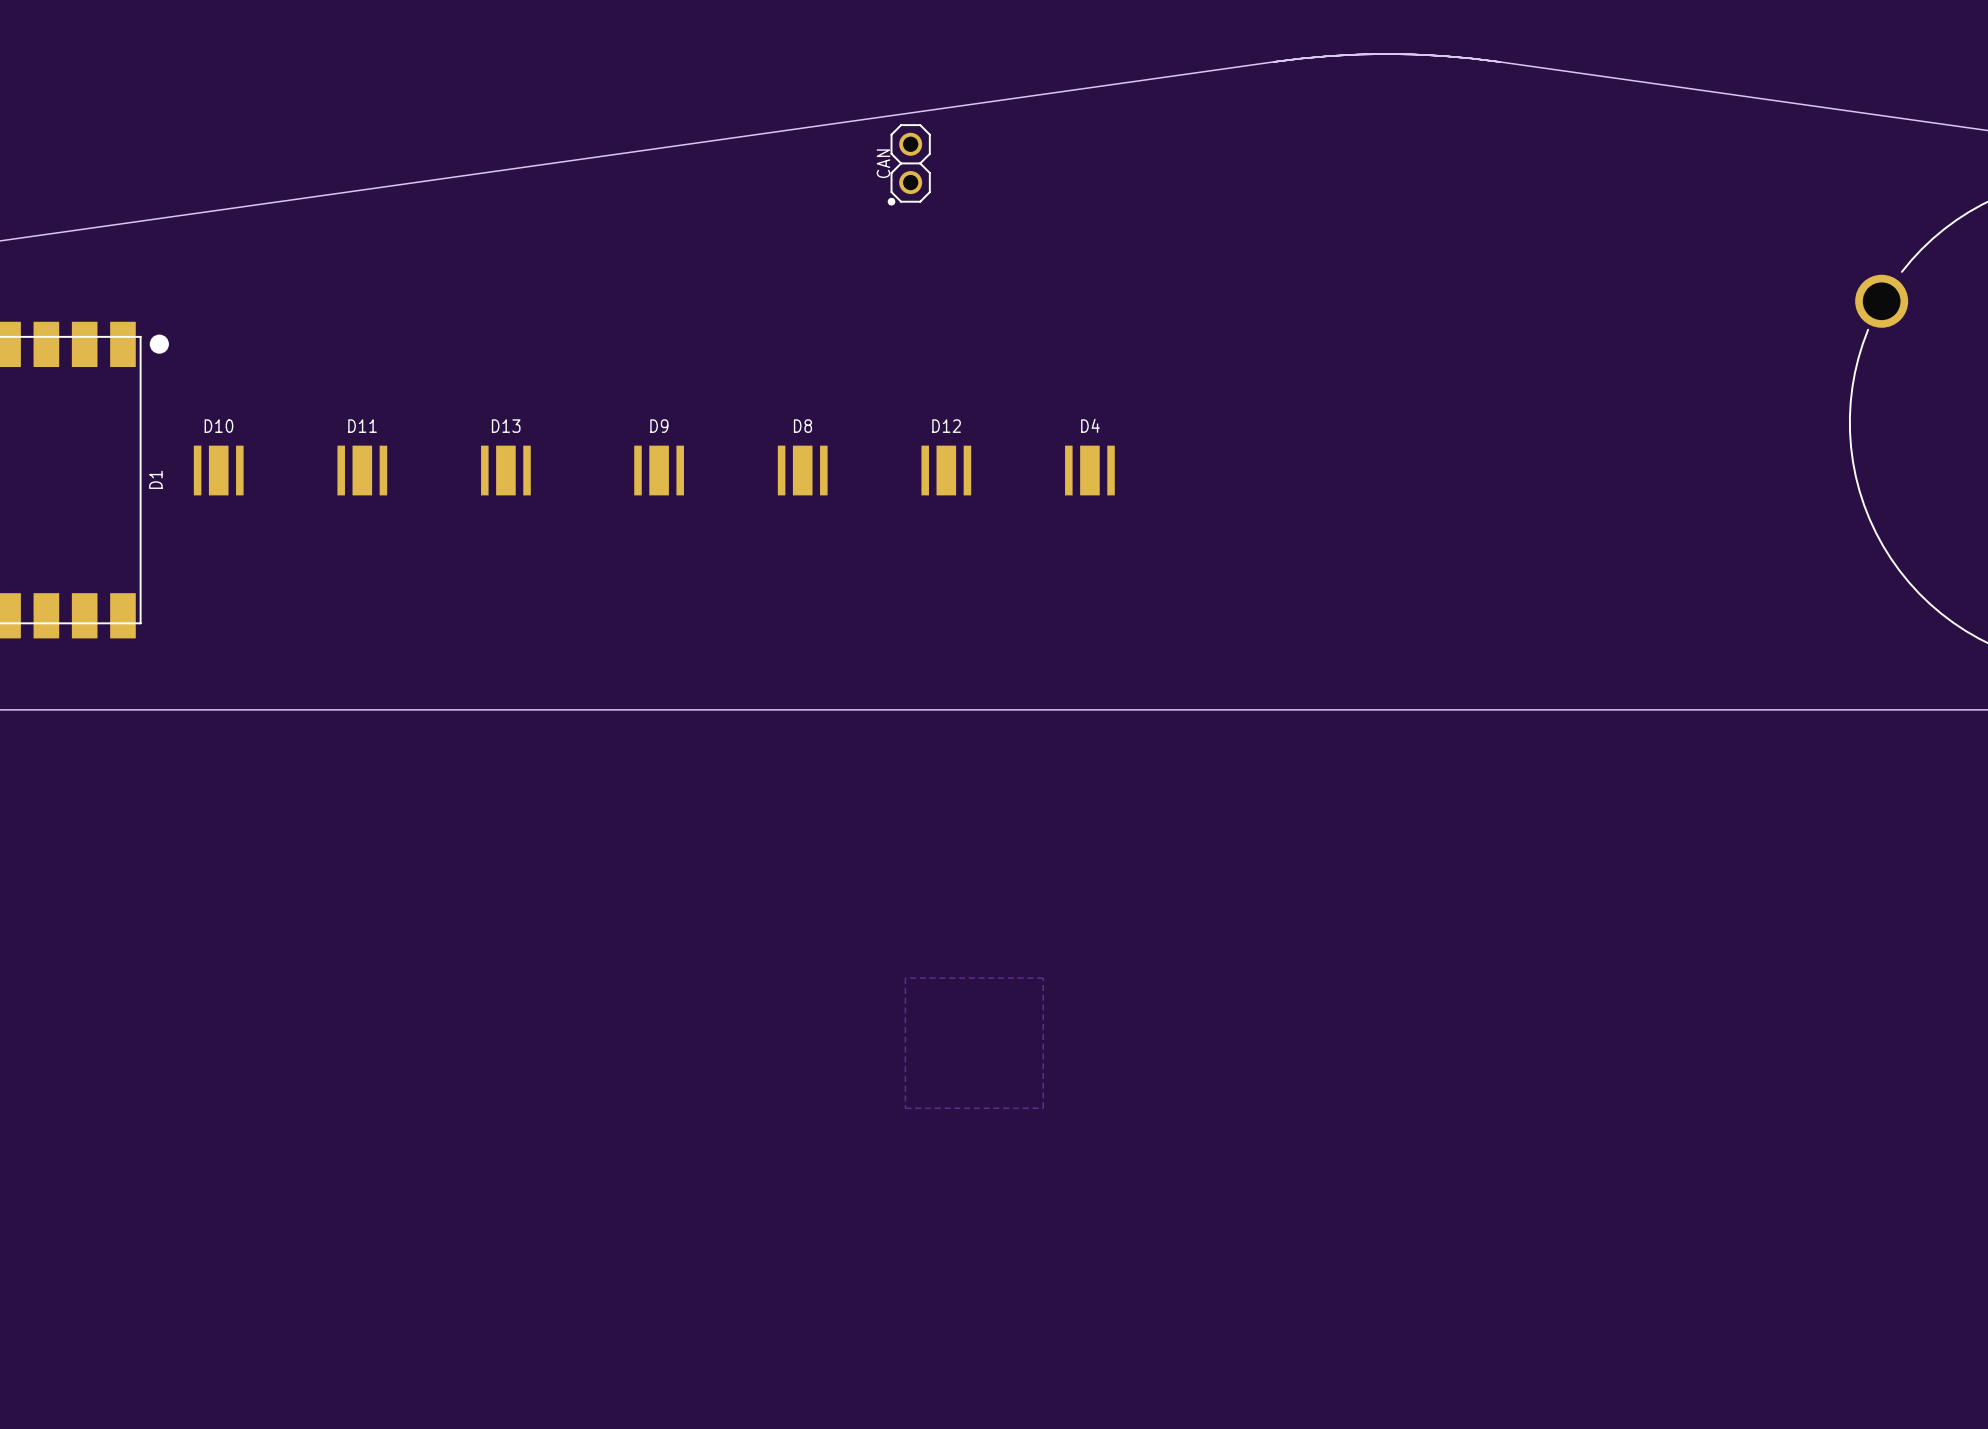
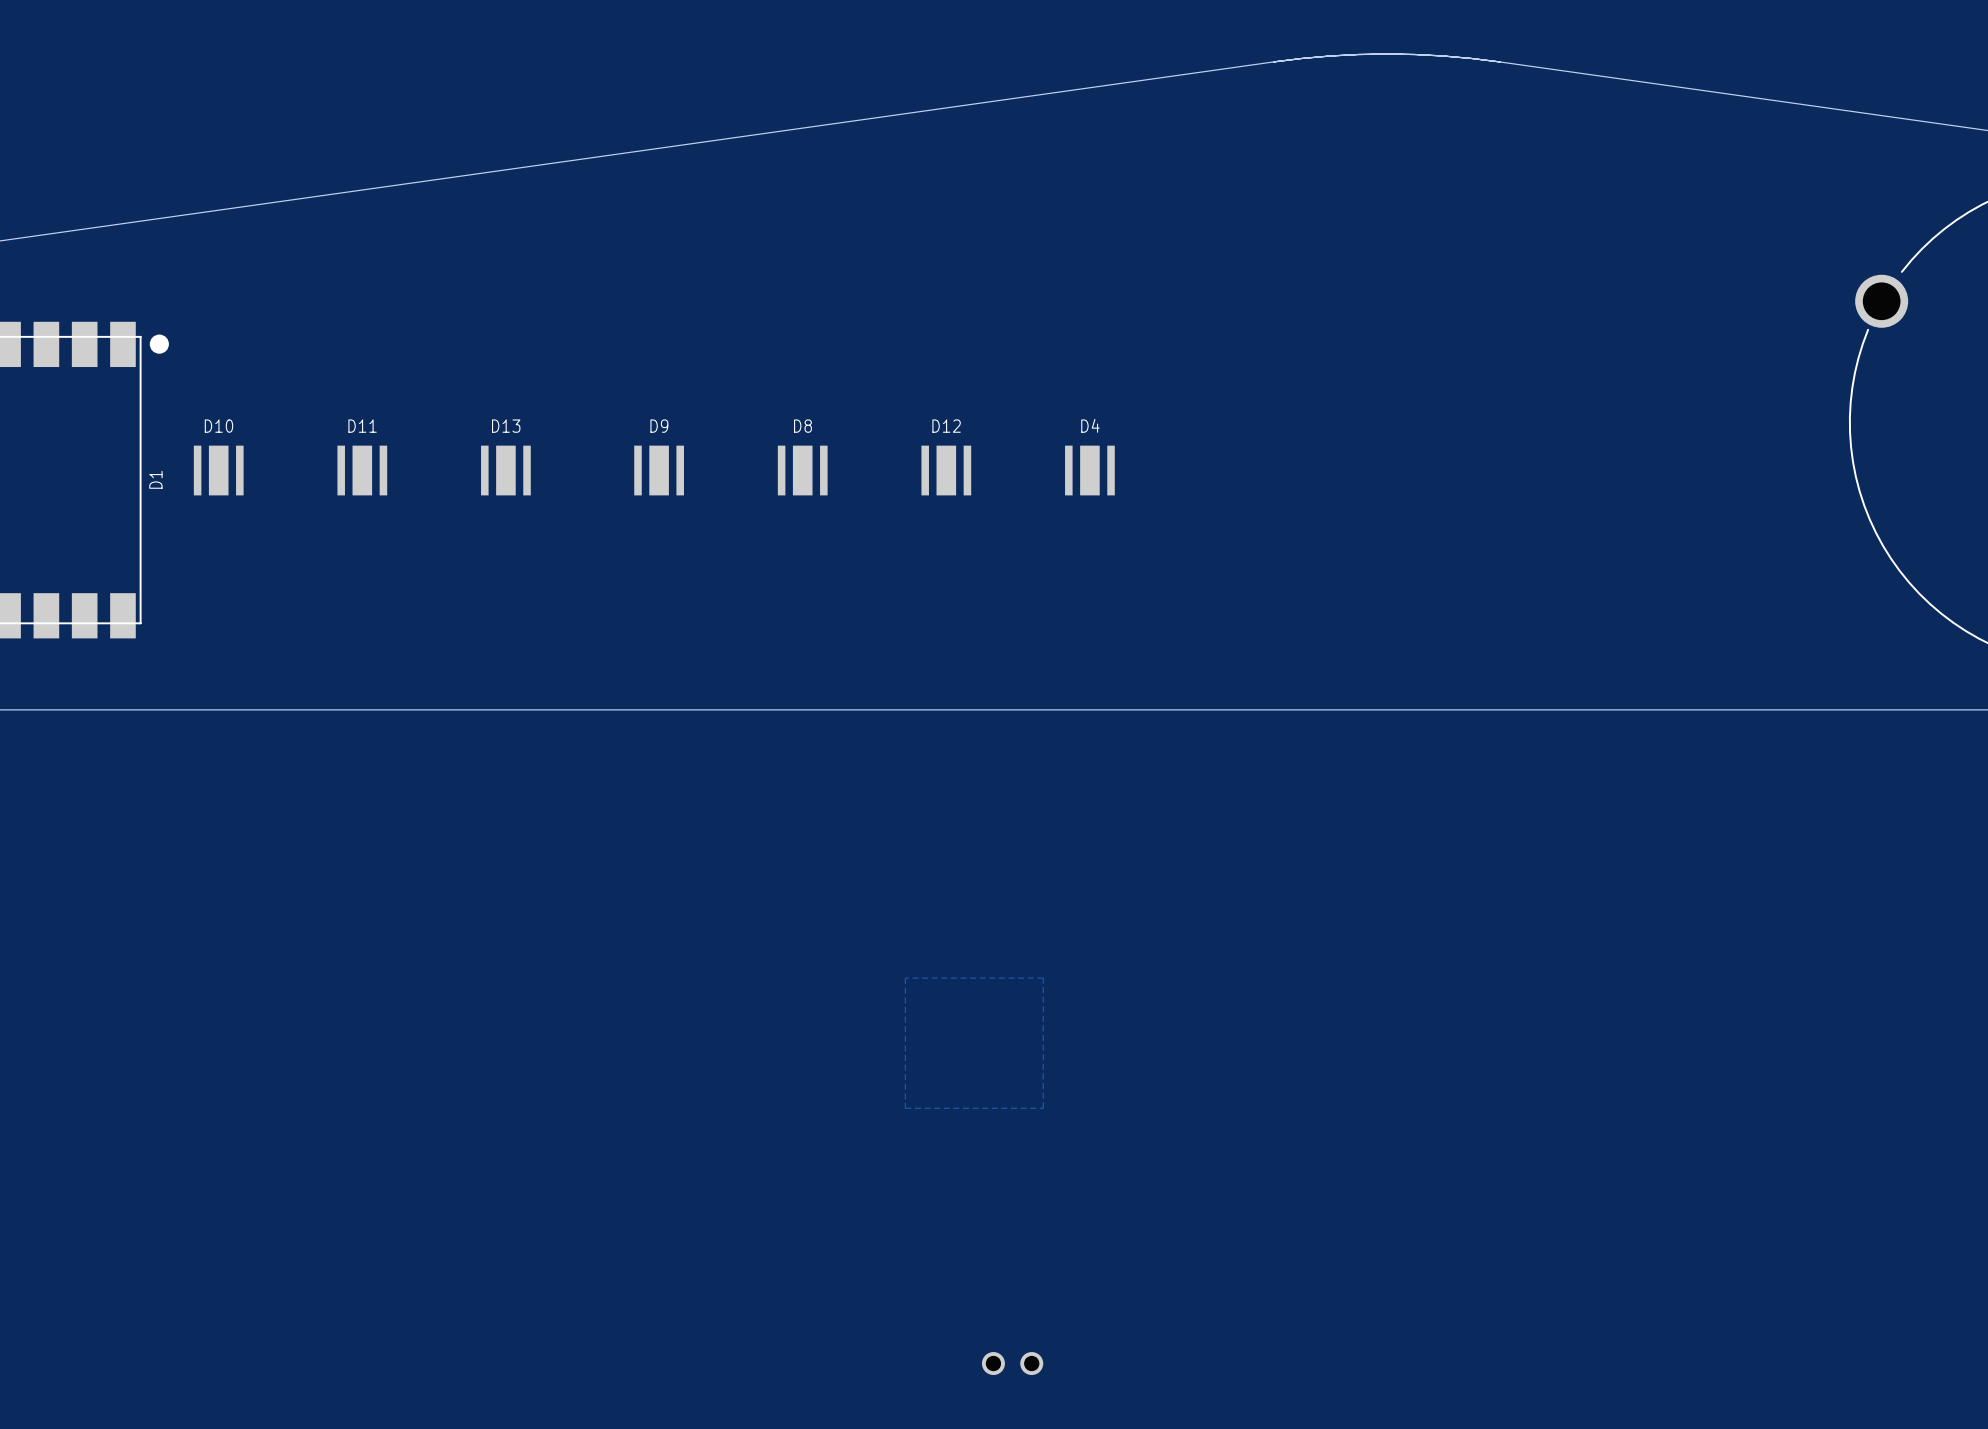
CAN: (909, 164) -> none
part: none -> (1012, 1363)

